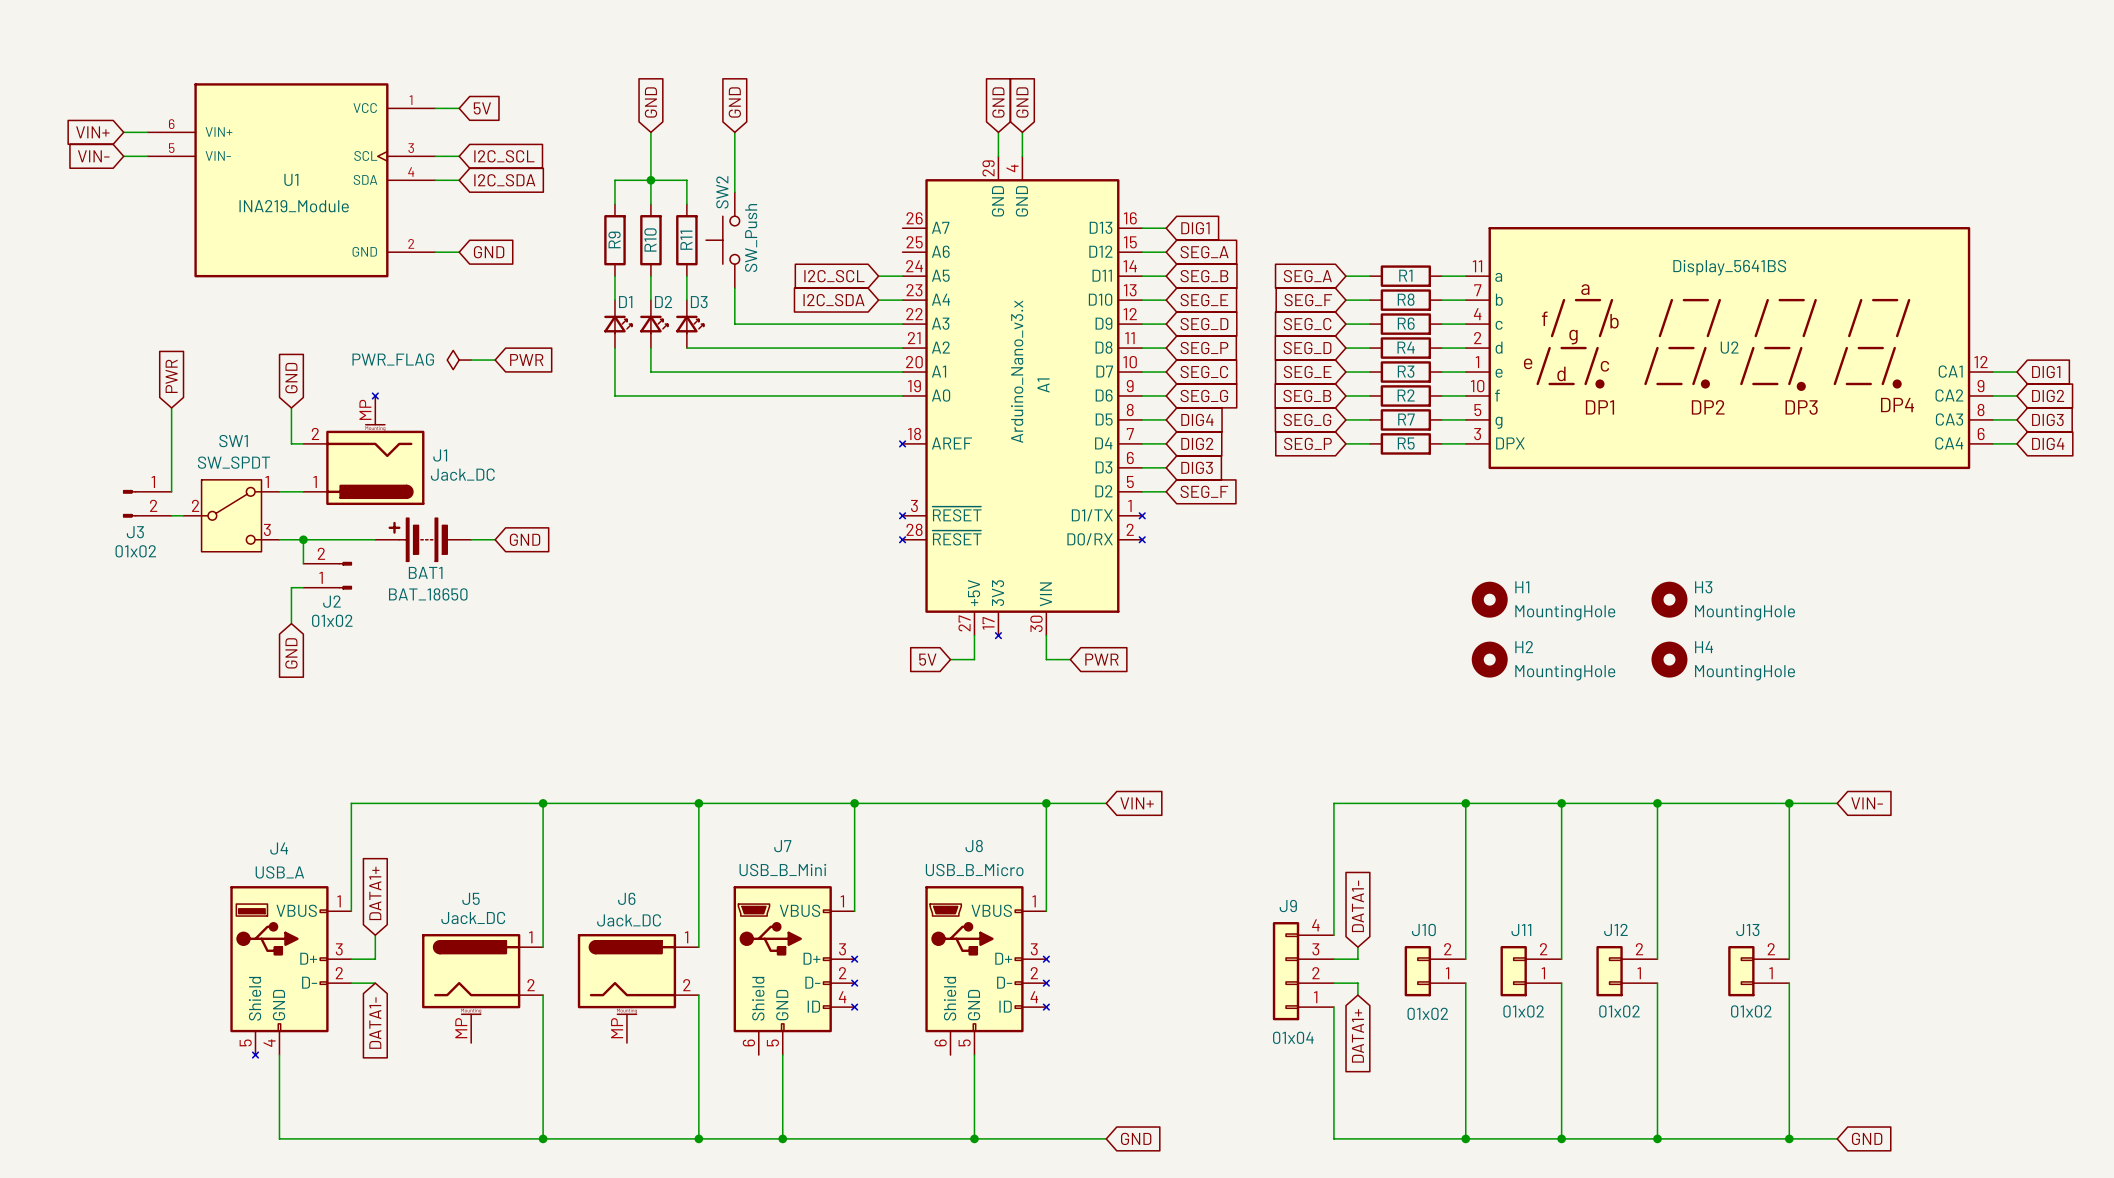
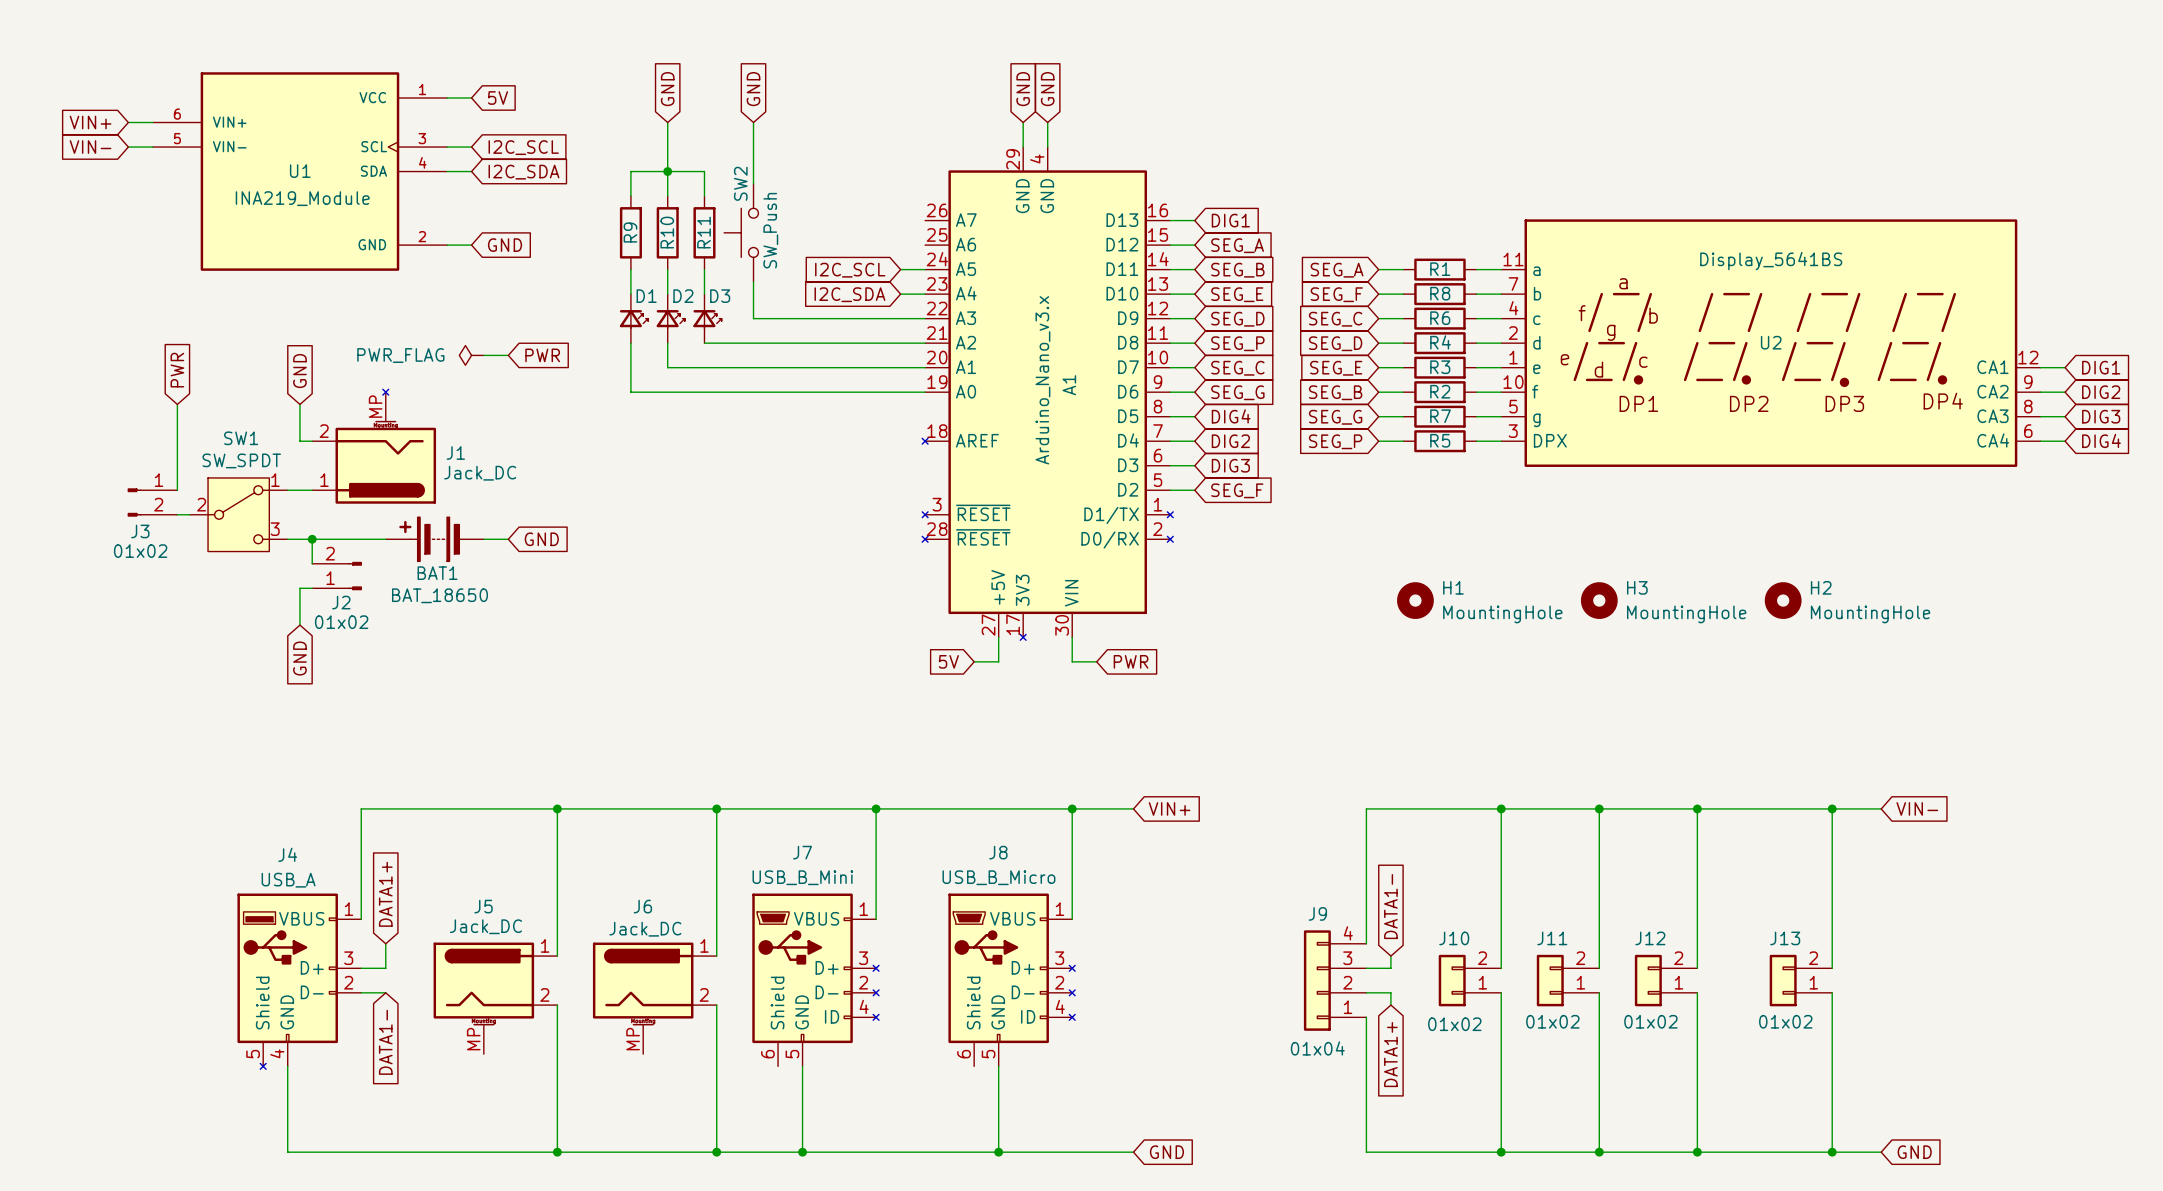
H1 position: (1489, 599) -> (1415, 600)
H3 position: (1669, 599) -> (1599, 600)
H2 position: (1489, 659) -> (1783, 600)
H4: MountingHole (1669, 659) -> none

